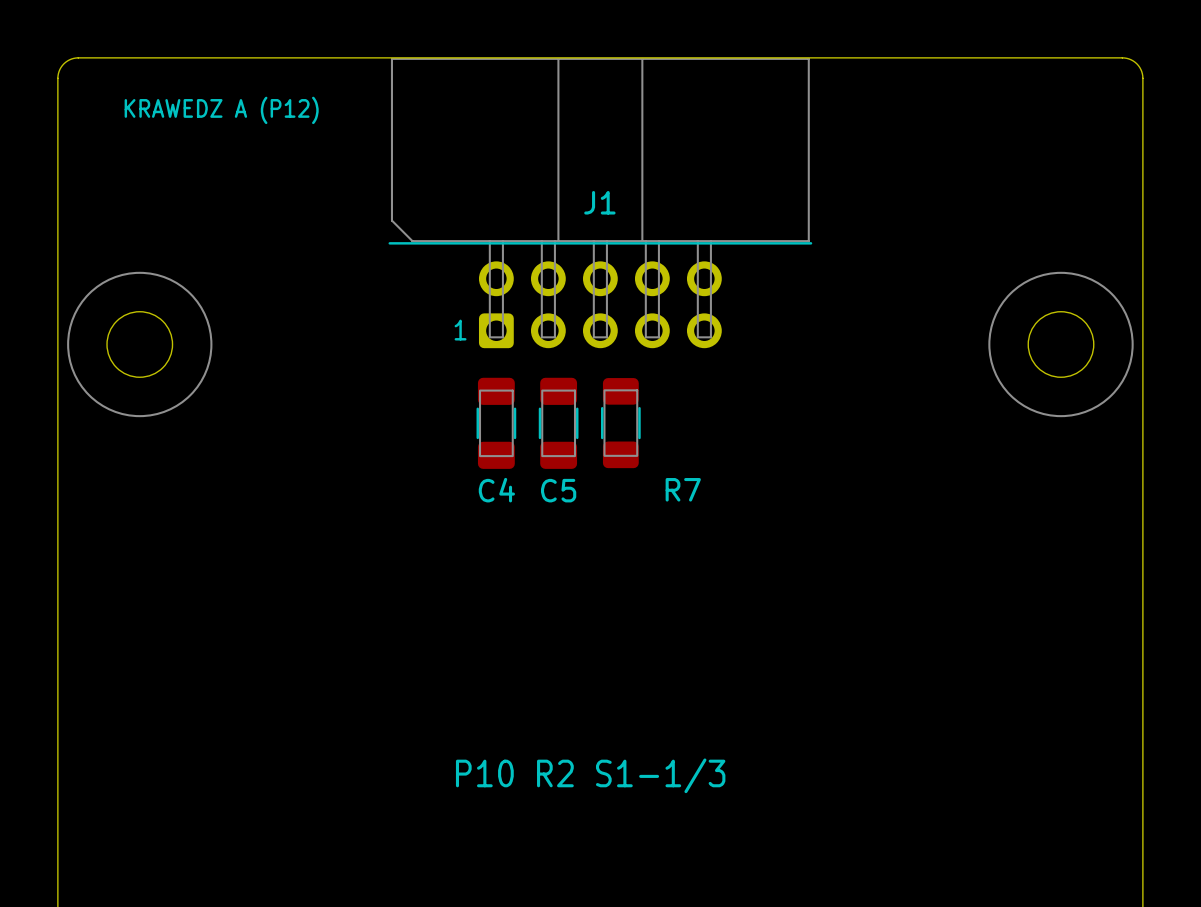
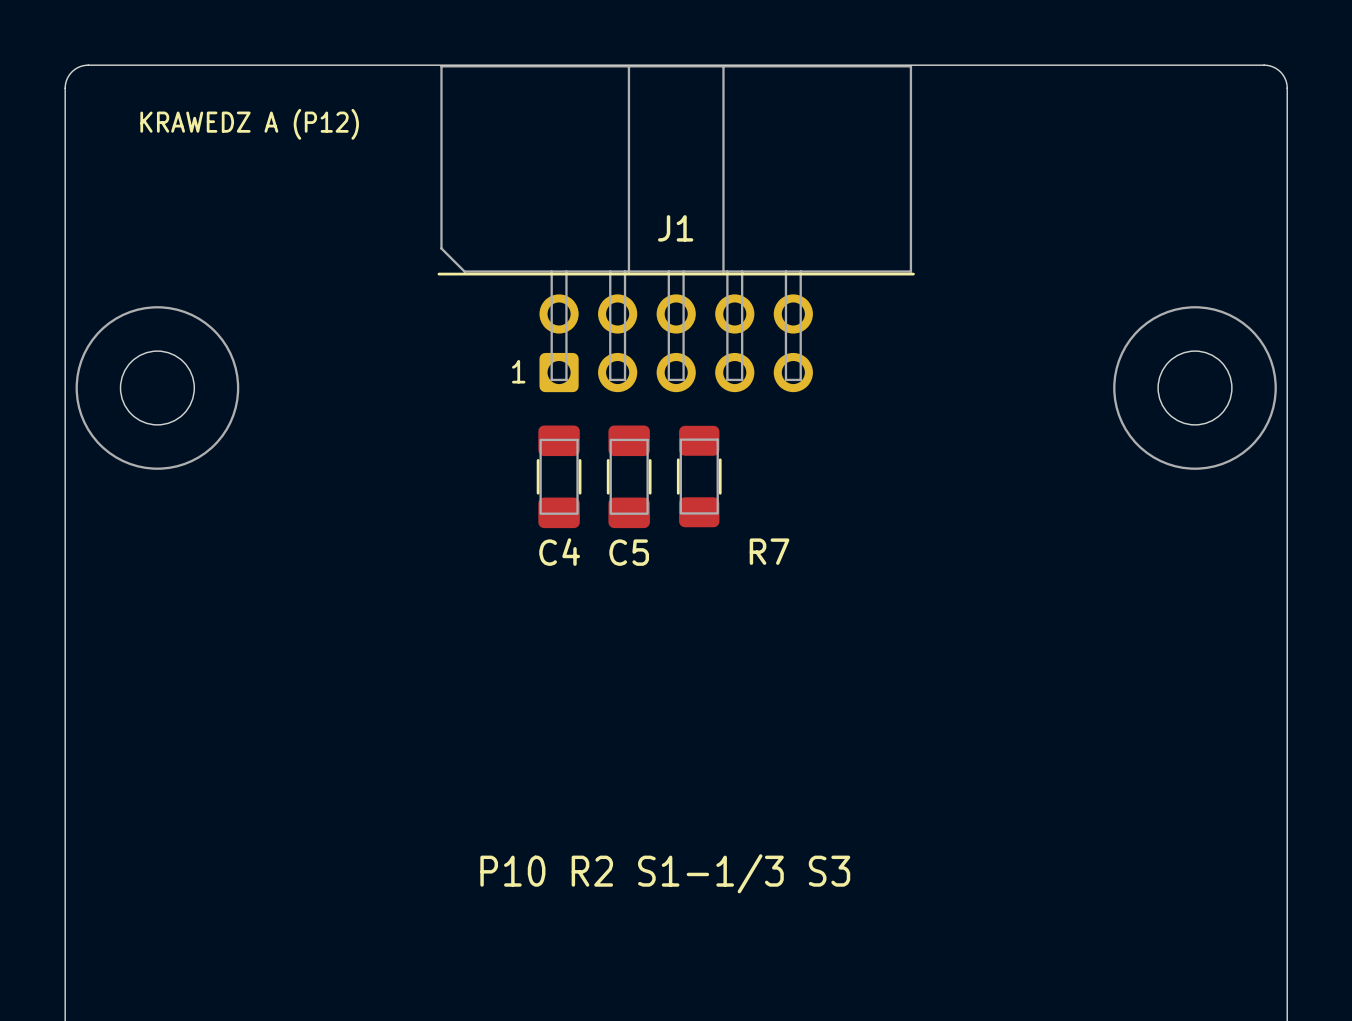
text: P10 R2 S1-1/3 (590, 775) -> P10 R2 S1-1/3 S3 (665, 873)

